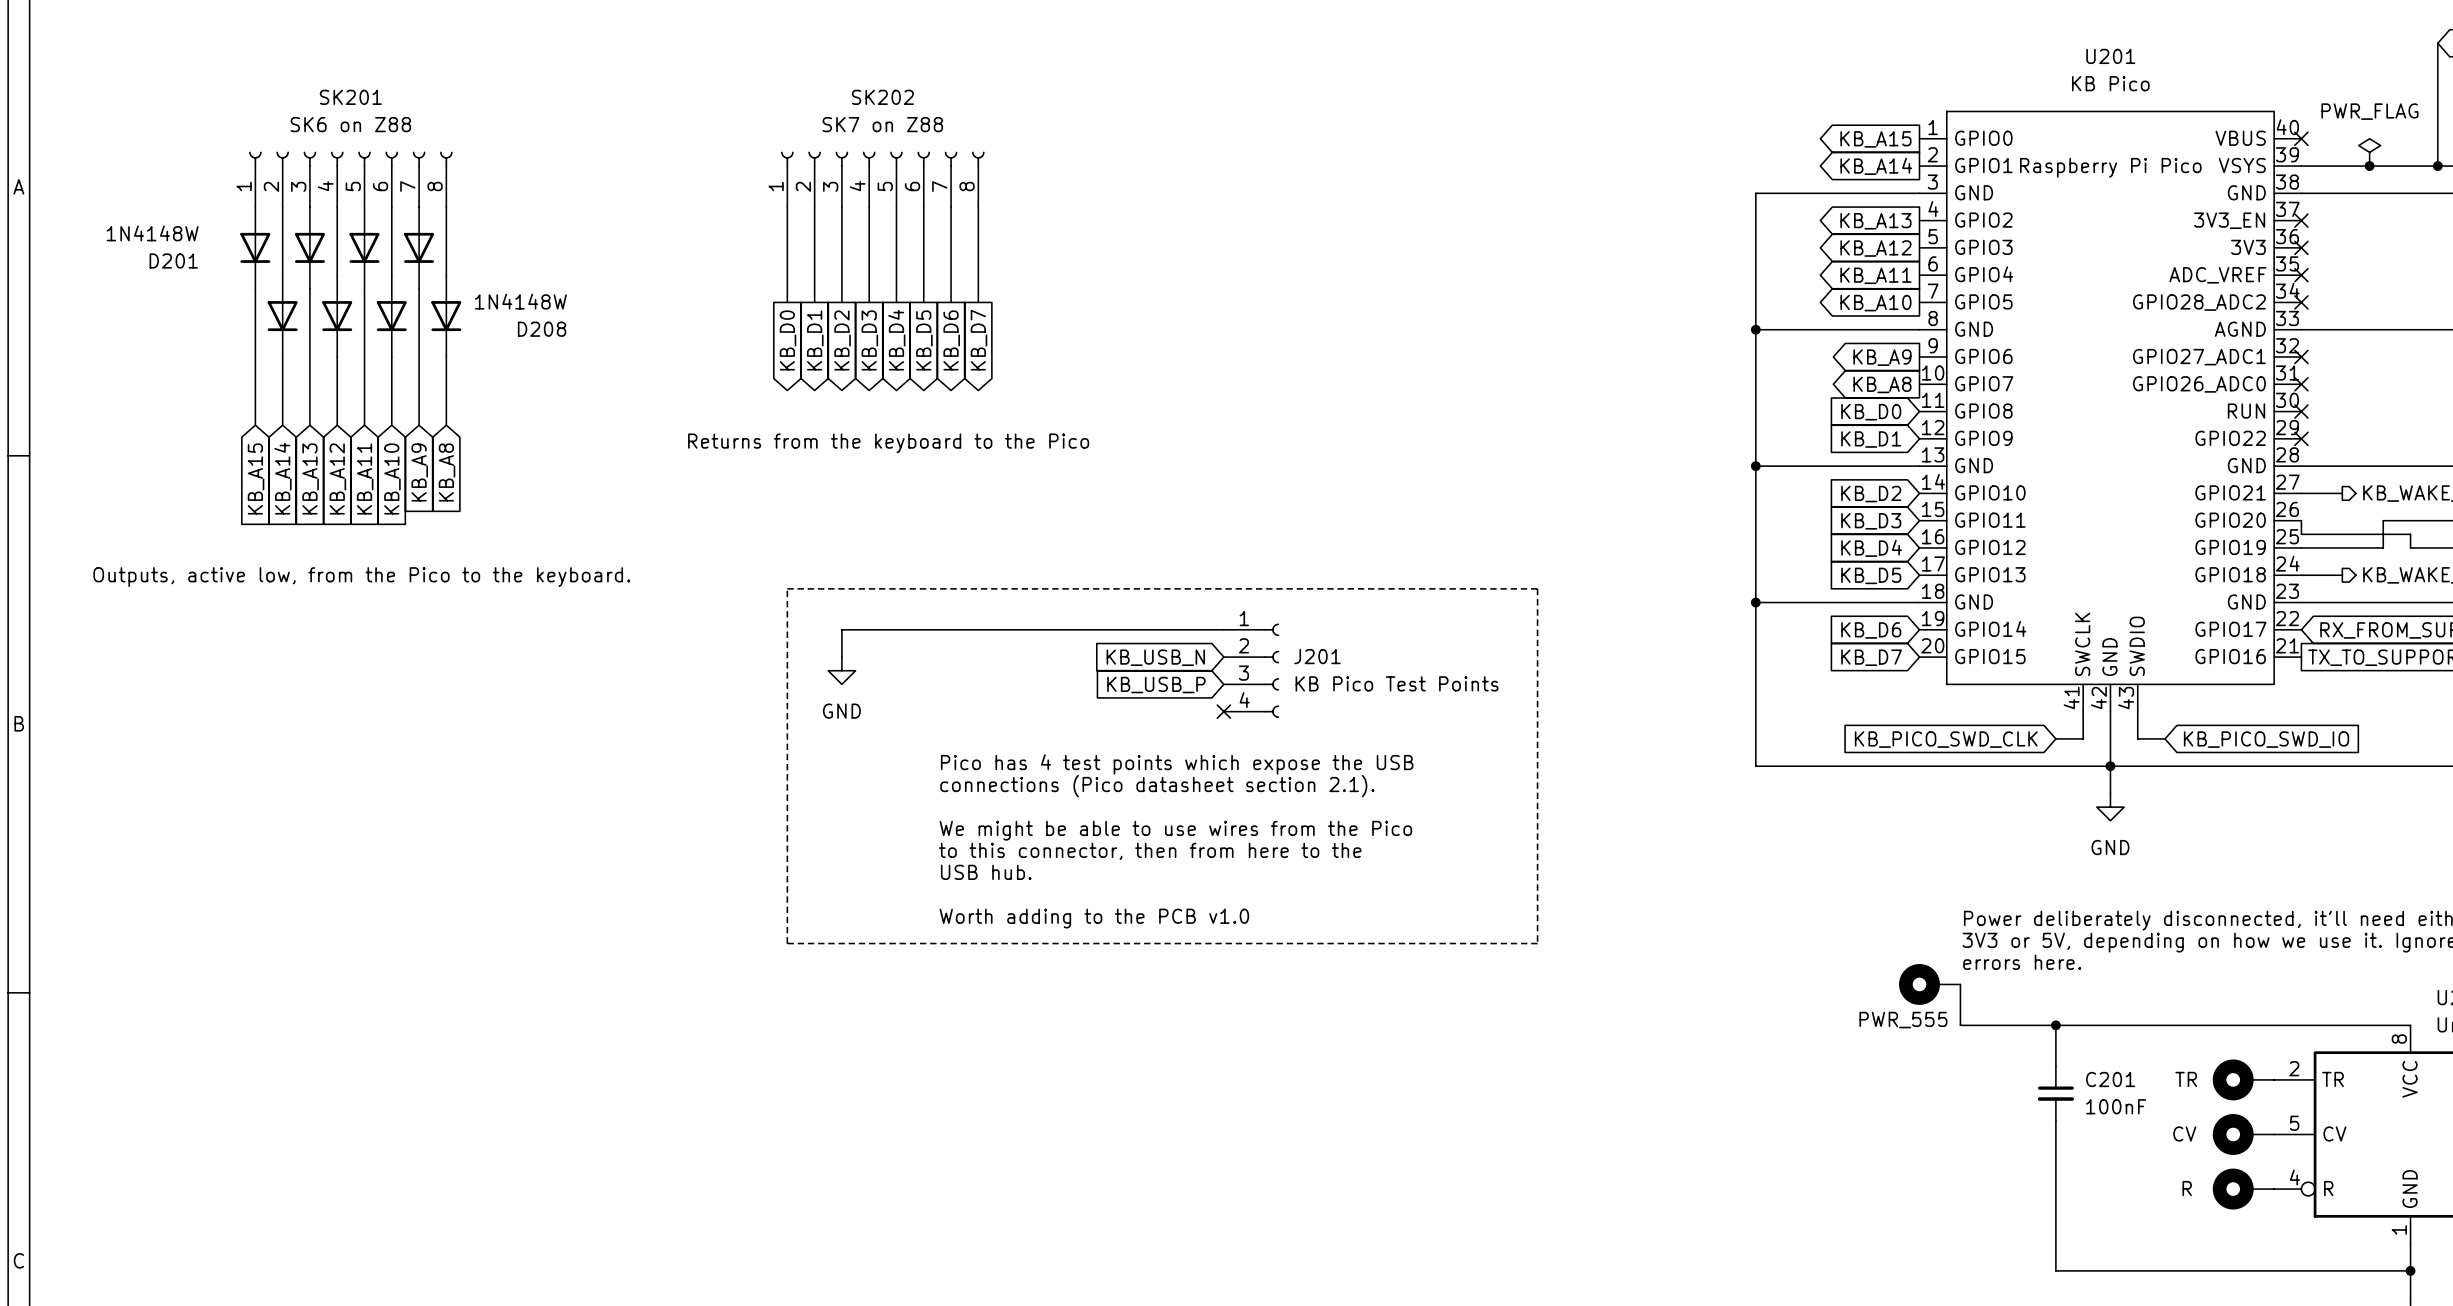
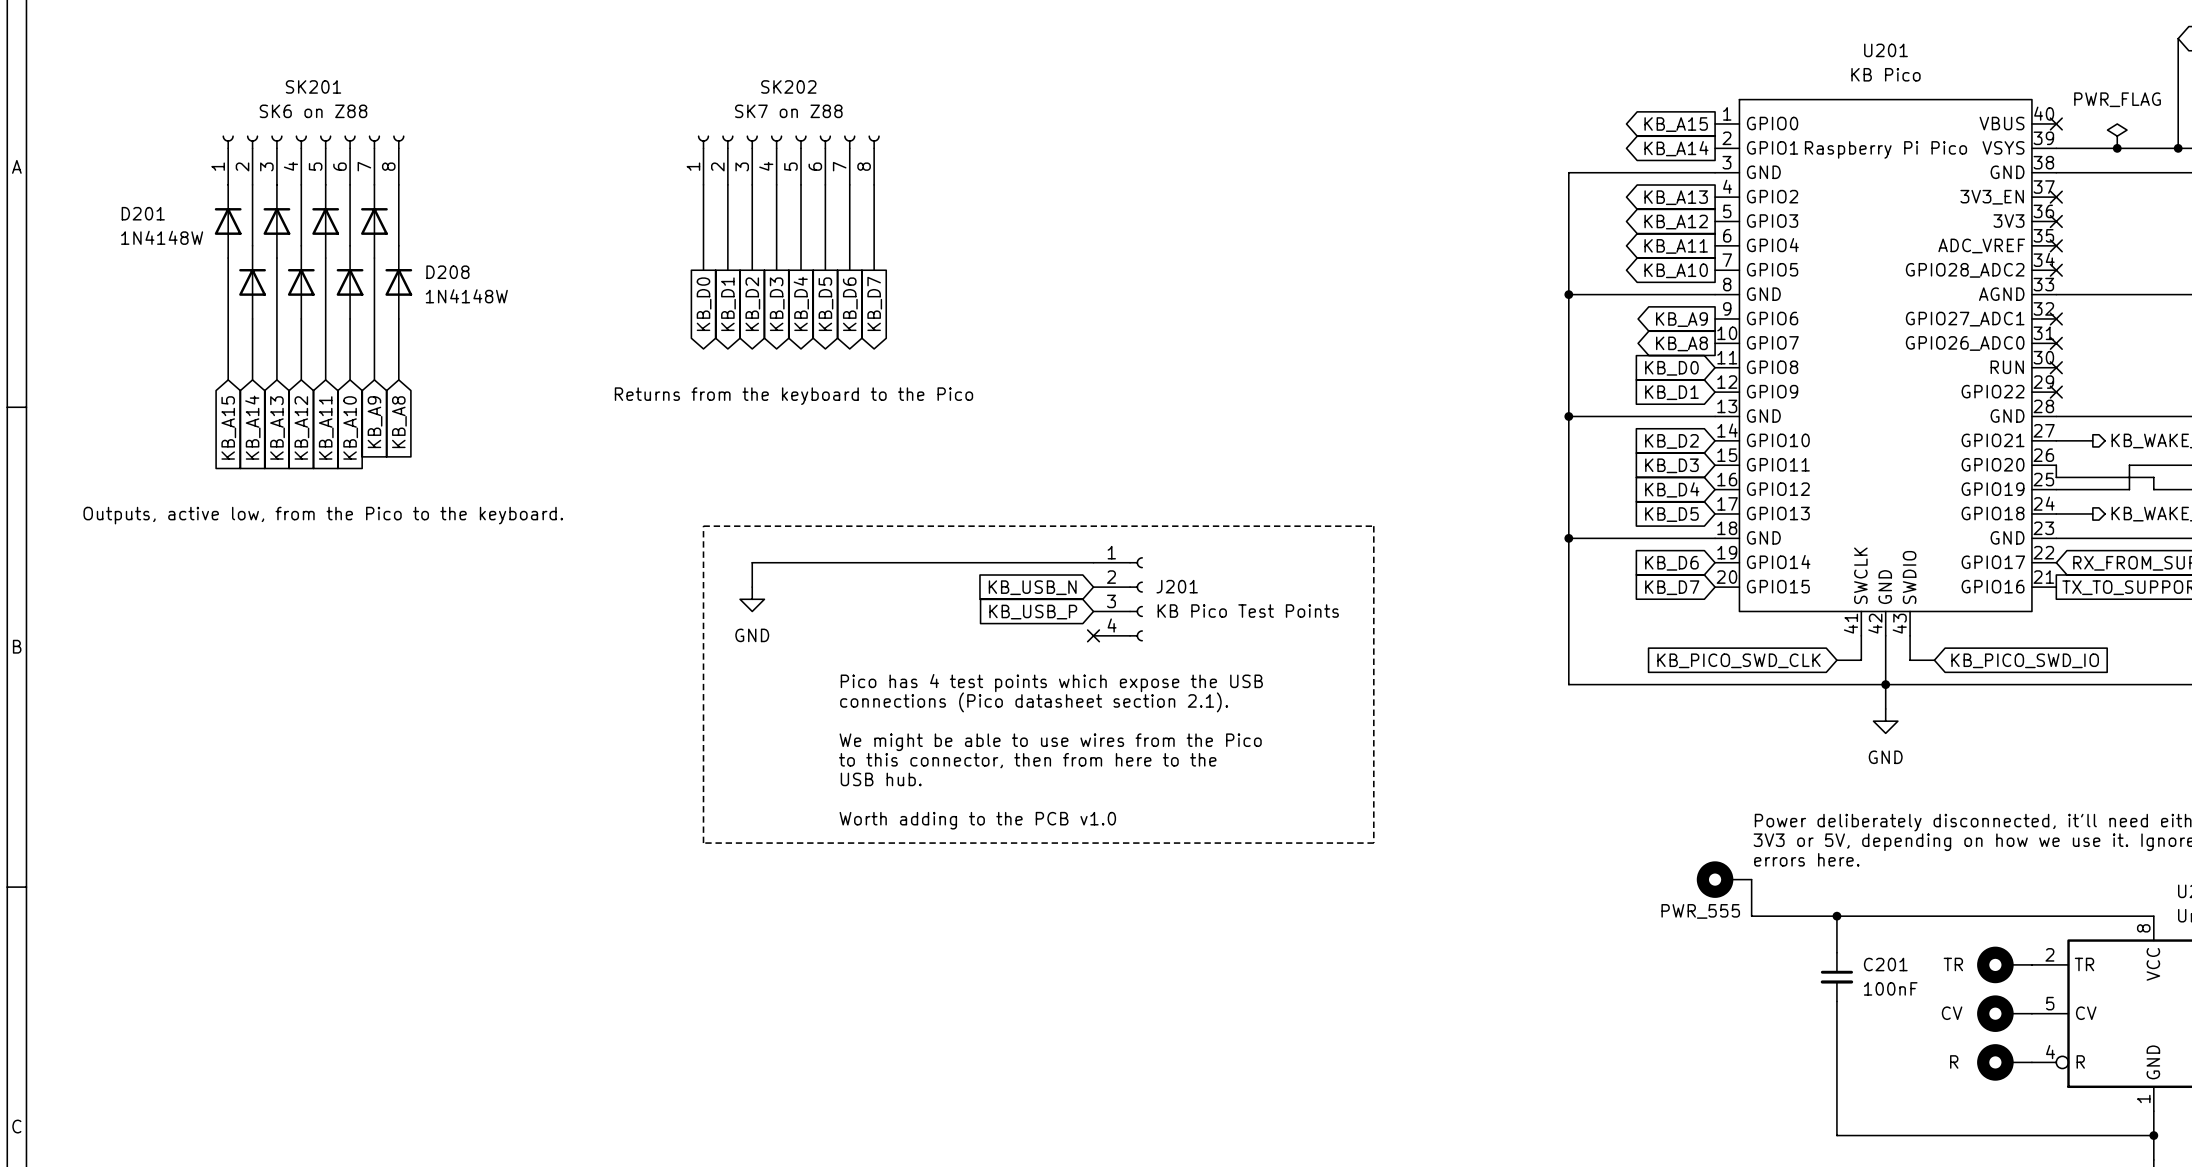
D201 value position: 1N4148W (152, 233) -> 1N4148W (162, 237)
D201 rotation: 0° (255, 247) -> 180° (228, 221)
part rotation: 0° (309, 247) -> 180° (276, 221)
part rotation: 0° (364, 247) -> 180° (325, 221)
part rotation: 0° (419, 247) -> 180° (374, 221)
D201 name position: D201 (173, 261) -> D201 (143, 213)
D208 value position: 1N4148W (520, 301) -> 1N4148W (466, 296)
part rotation: 0° (282, 316) -> 180° (252, 282)
part rotation: 0° (337, 316) -> 180° (301, 282)
part rotation: 0° (391, 316) -> 180° (350, 282)
D208 rotation: 0° (446, 316) -> 180° (398, 282)
D208 name position: D208 (542, 329) -> D208 (447, 272)

